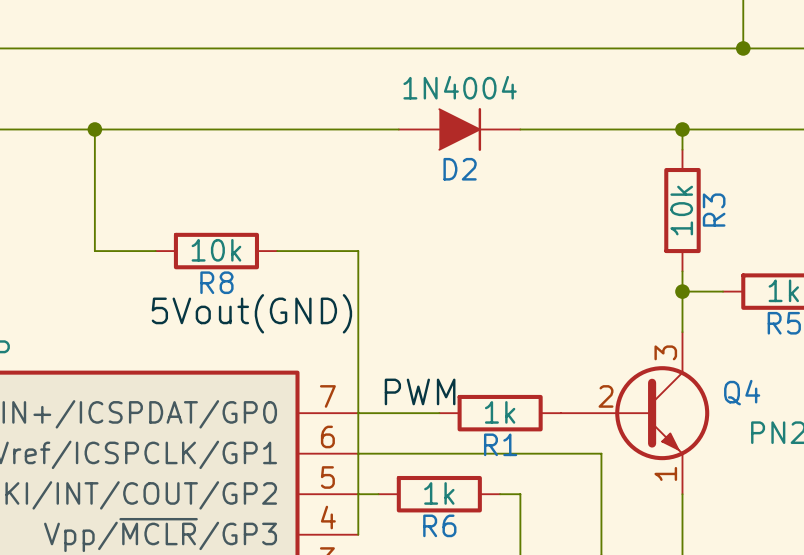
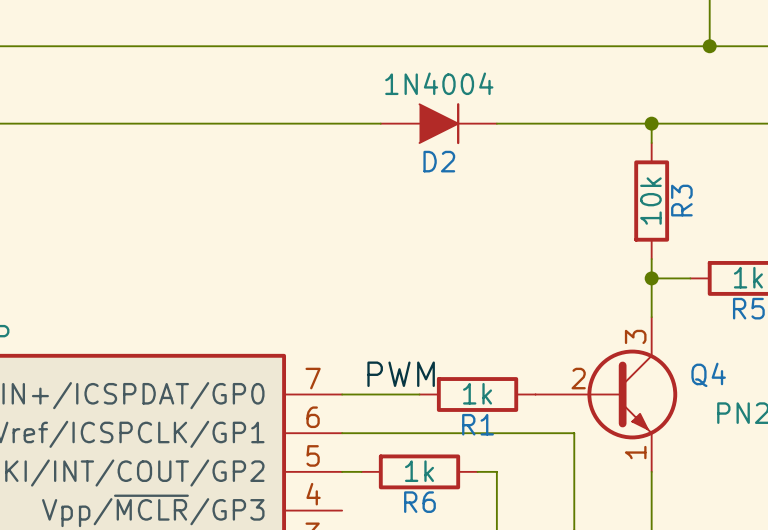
wire: (94, 129) (94, 251) (155, 251) -> none
junction: (94, 129) -> none
R8: 10k (216, 251) -> none
wire: (277, 251) (358, 251) (358, 534) -> none
label: 5Vout(GND) (251, 313) -> none

